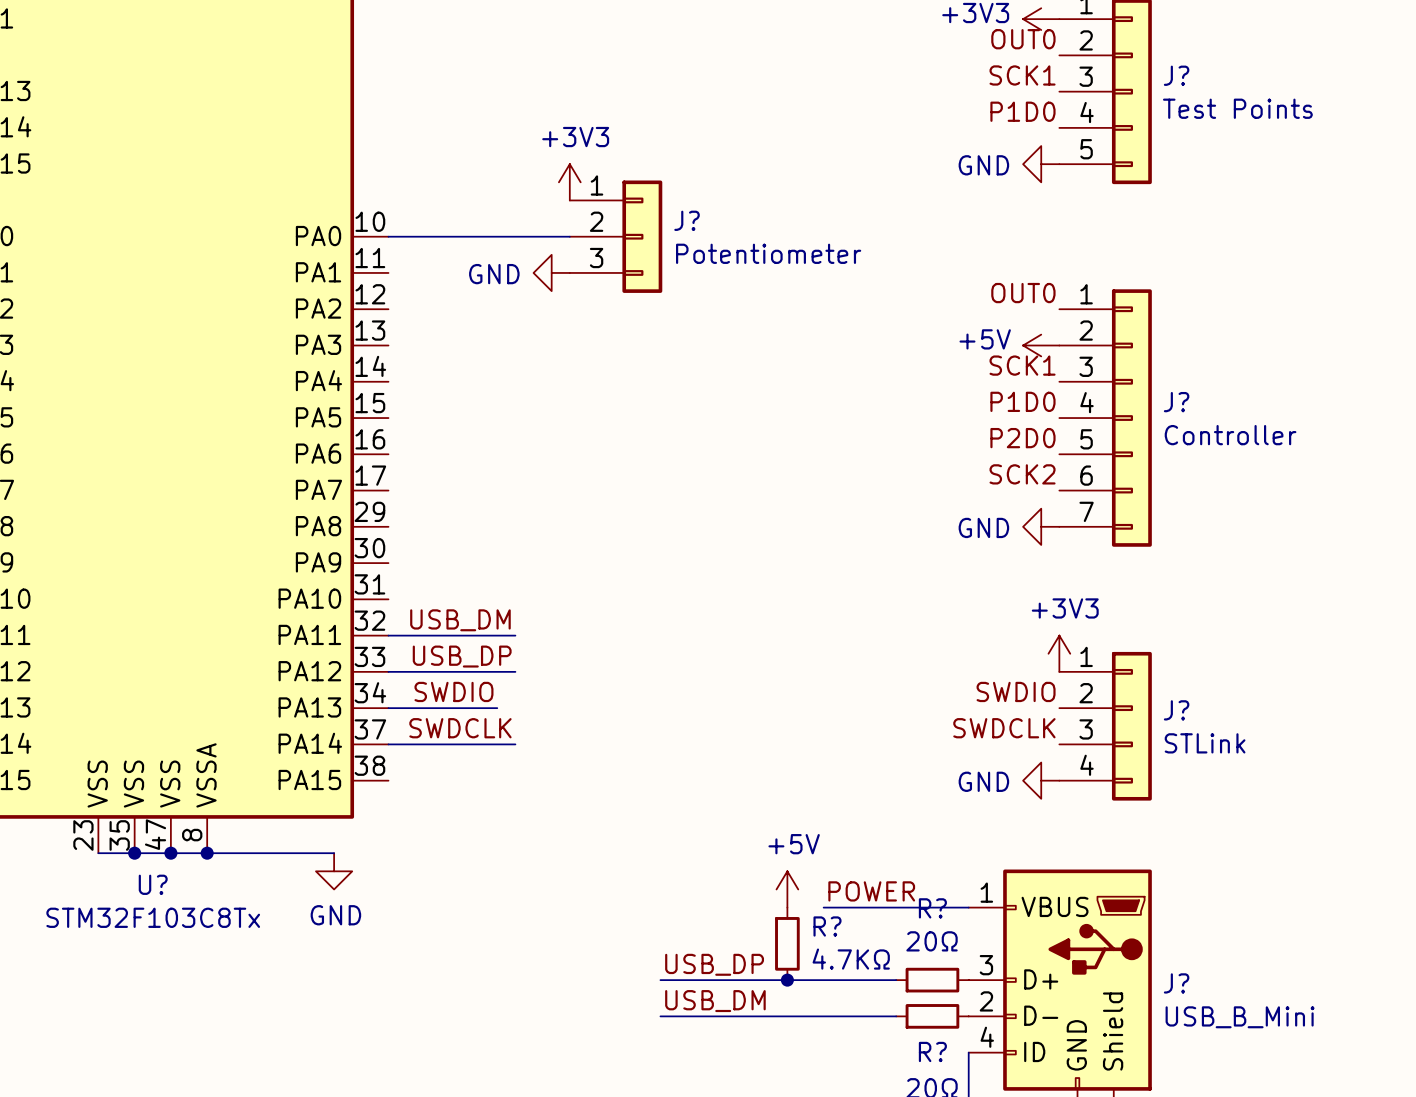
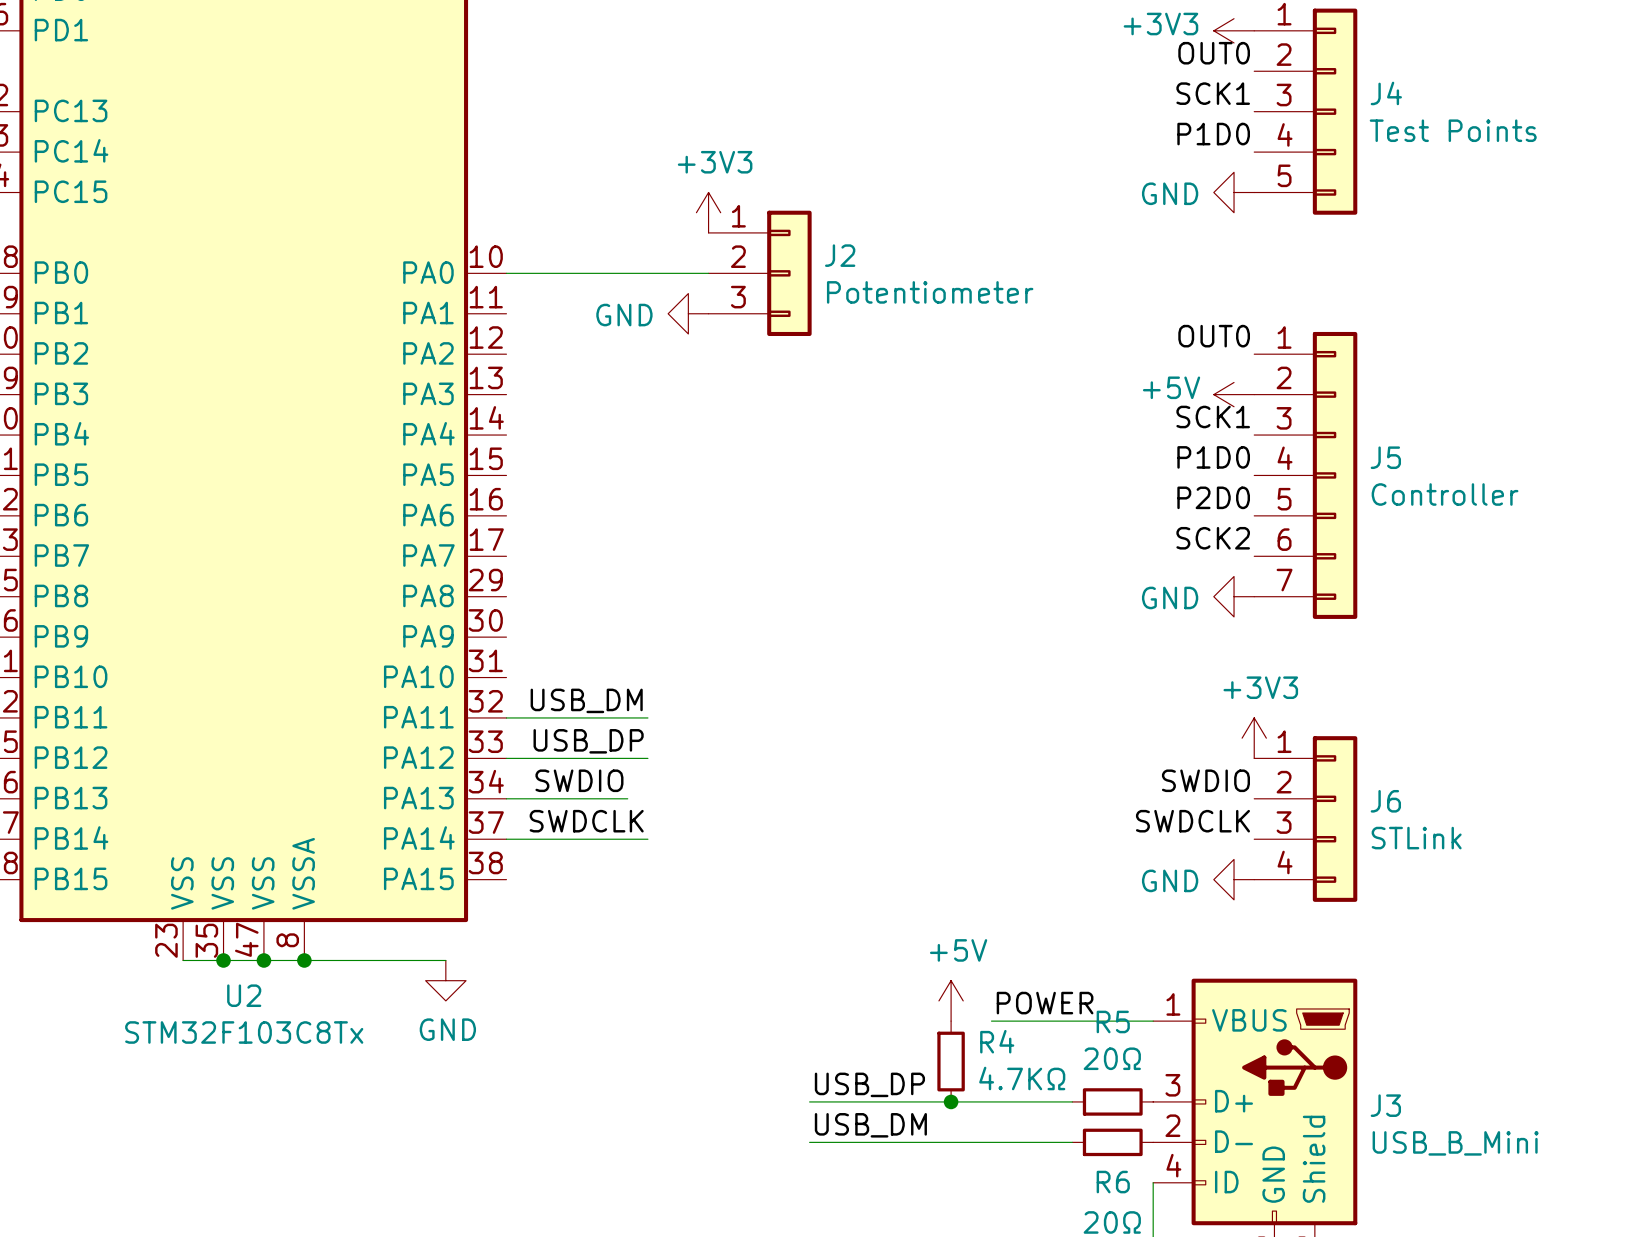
J? name: J? (1176, 75) -> J4 (1386, 93)
J? name: J? (687, 220) -> J2 (840, 255)
J? name: J? (1176, 402) -> J5 (1385, 457)
J? name: J? (1176, 710) -> J6 (1385, 801)
U? name: U? (153, 884) -> U2 (244, 995)
R? name: R? (932, 908) -> R5 (1113, 1021)
R? name: R? (827, 926) -> R4 (997, 1041)
J? name: J? (1176, 983) -> J3 (1385, 1105)
R? name: R? (932, 1051) -> R6 (1113, 1182)

